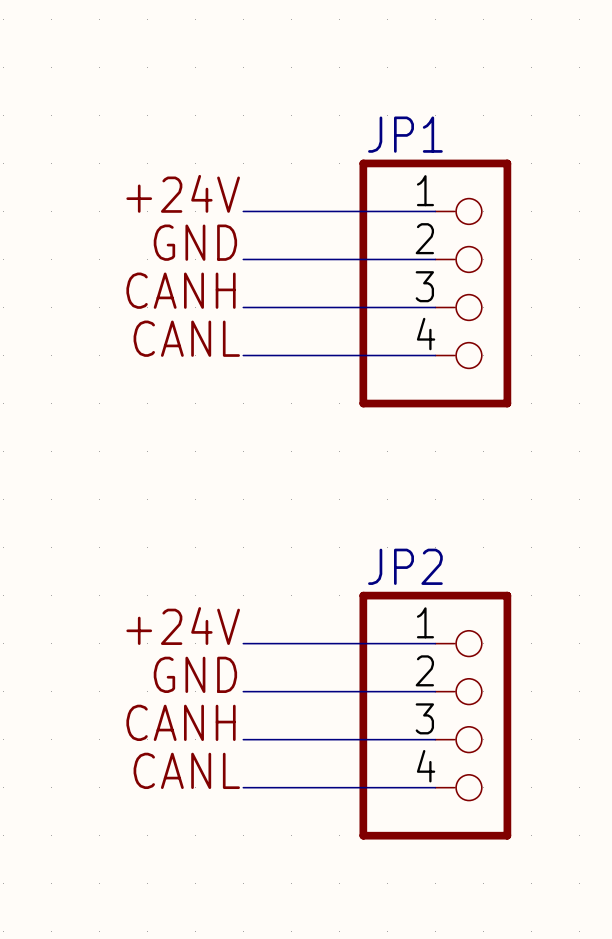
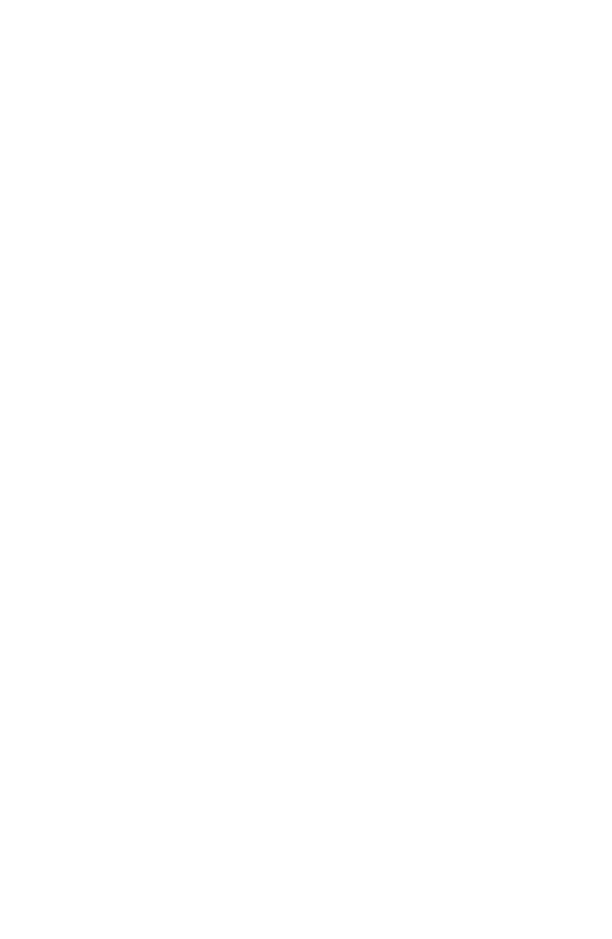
label: +24V (183, 193) -> none
wire: (243, 211) (435, 211) -> none
label: GND (195, 242) -> none
wire: (243, 259) (435, 259) -> none
JP1: (435, 283) -> none
label: CANH (181, 290) -> none
wire: (243, 307) (435, 307) -> none
label: CANL (186, 338) -> none
wire: (243, 355) (435, 355) -> none
label: +24V (183, 626) -> none
wire: (243, 643) (435, 643) -> none
label: GND (195, 674) -> none
wire: (243, 691) (435, 691) -> none
JP2: (435, 715) -> none
label: CANH (181, 722) -> none
wire: (243, 739) (435, 739) -> none
label: CANL (186, 770) -> none
wire: (243, 787) (435, 787) -> none

